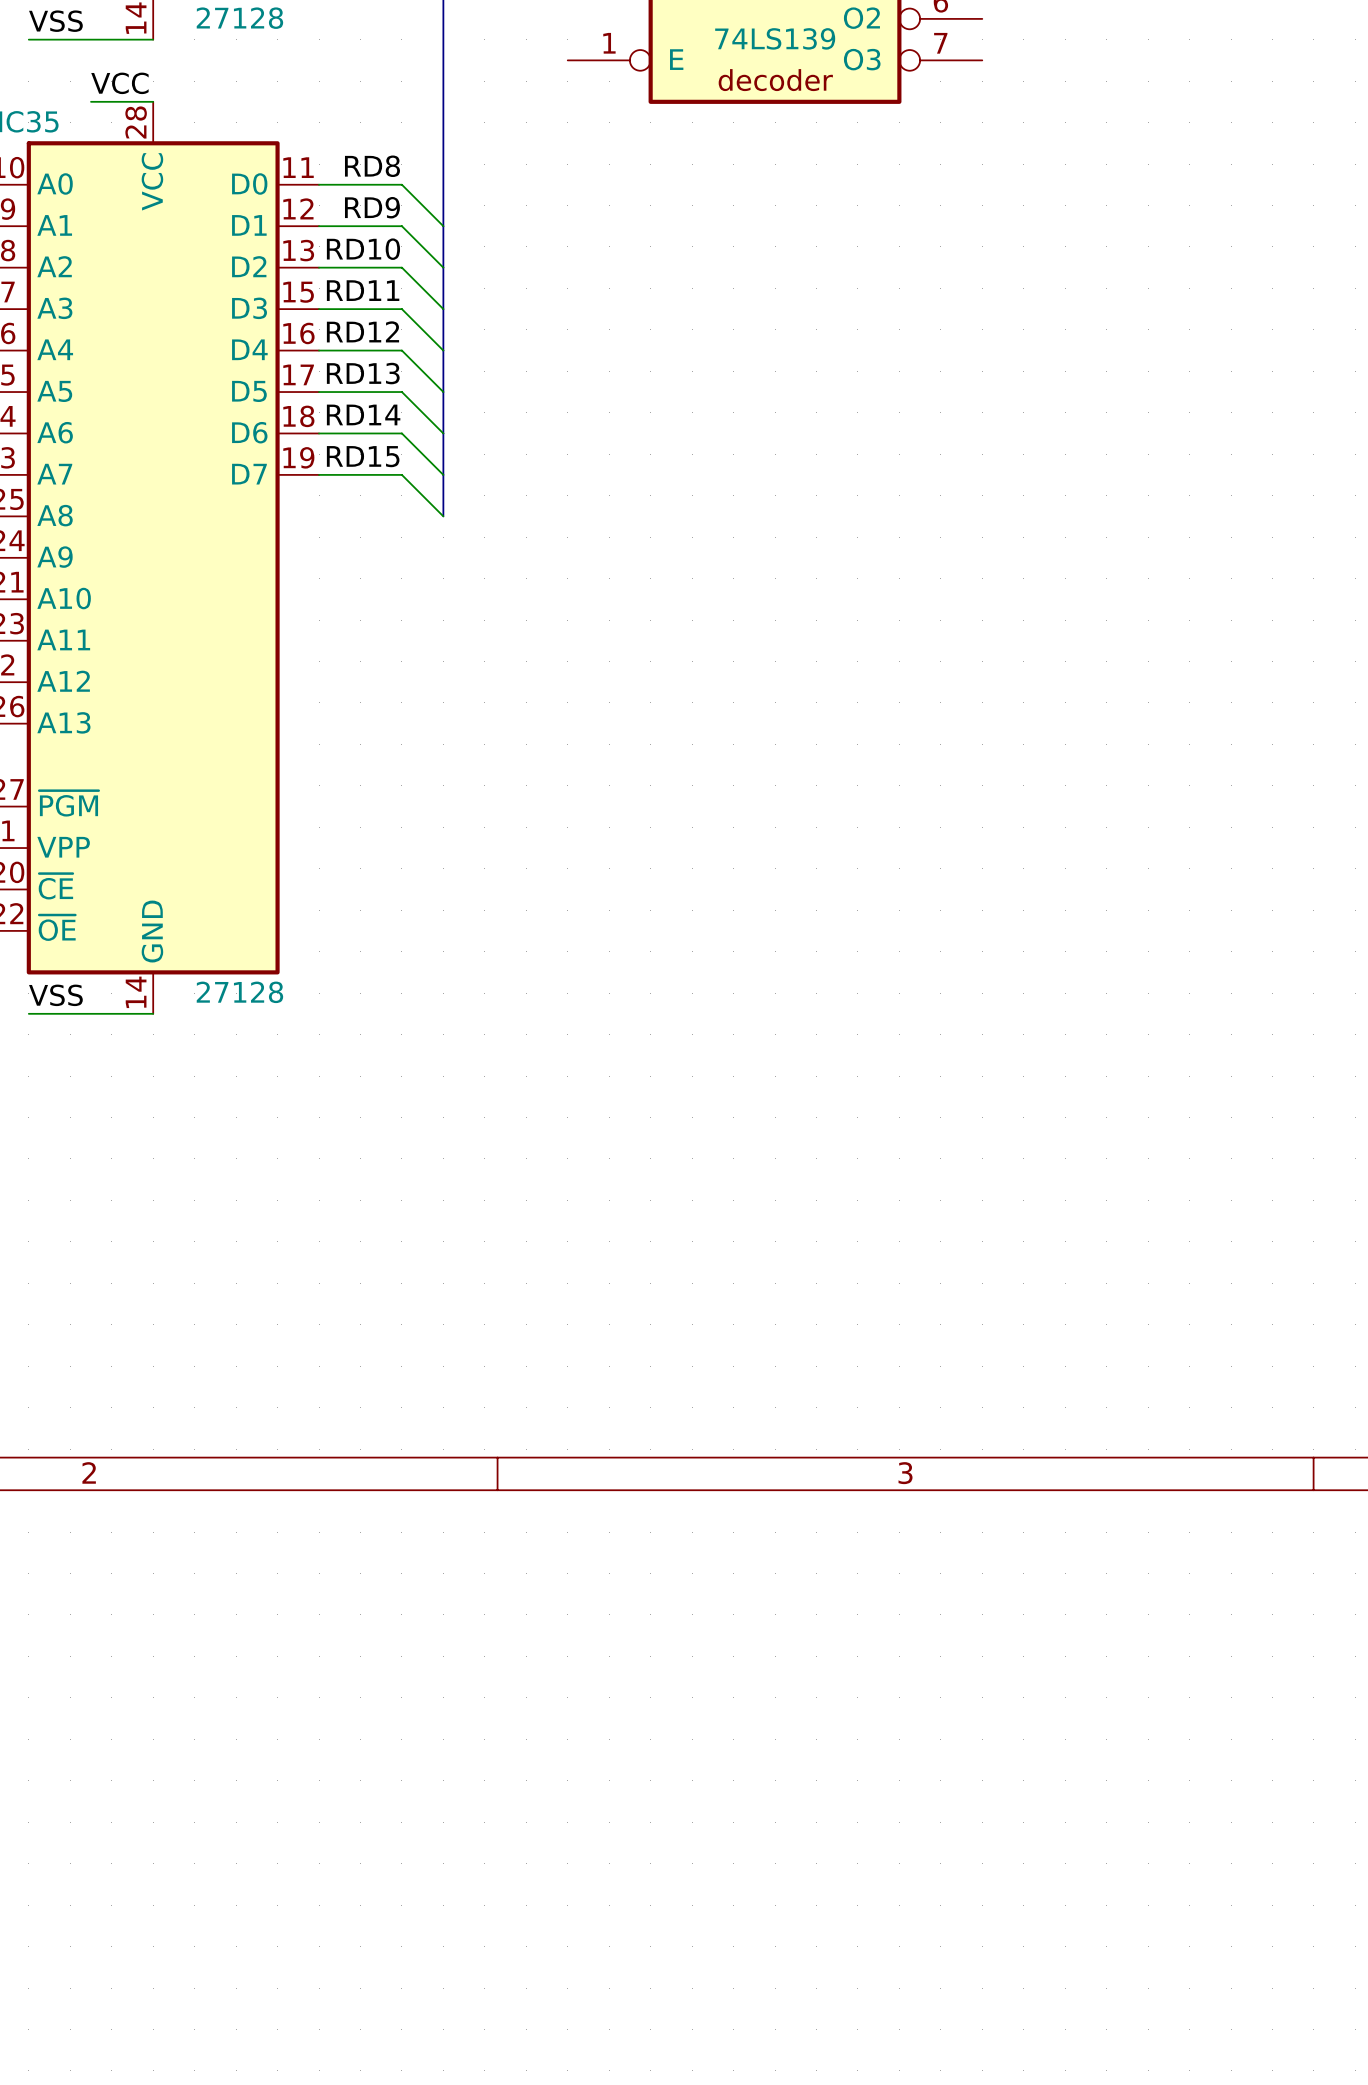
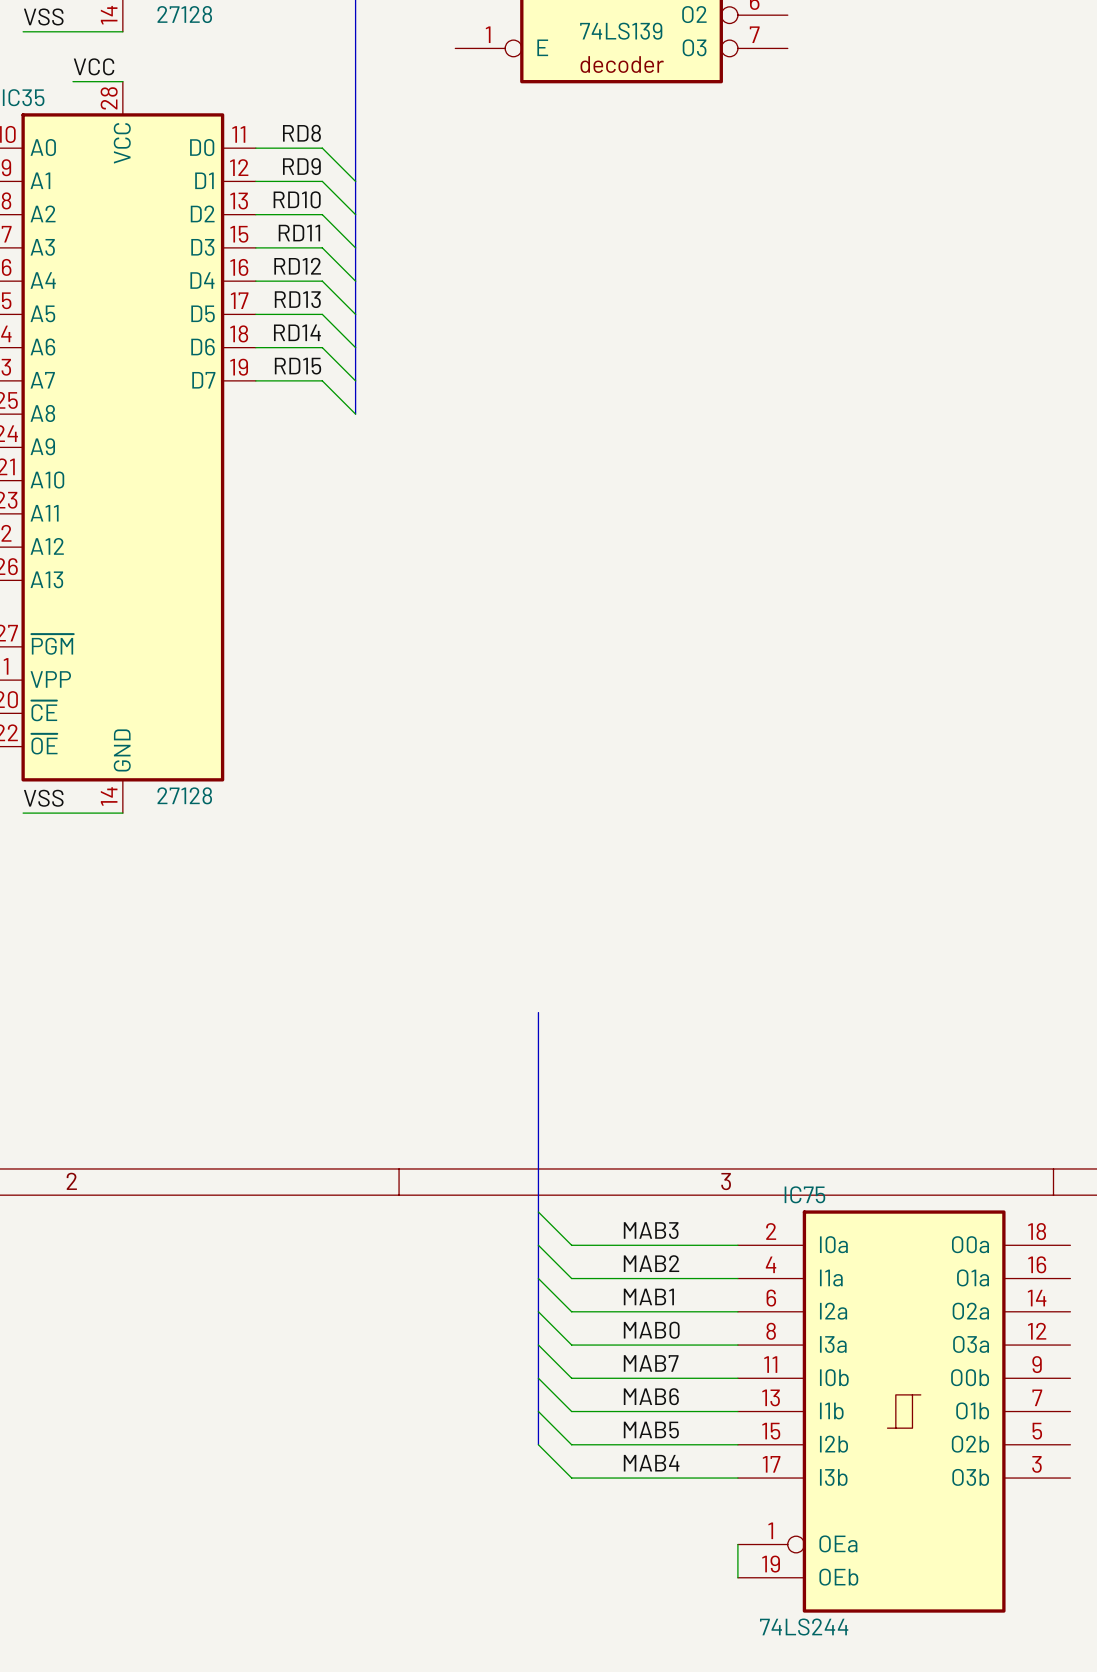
bus: none -> (538, 1012) (538, 1444)
wire: none -> (538, 1212) (571, 1245) (737, 1245)
label: none -> MAB3 (651, 1230)
wire: none -> (538, 1245) (571, 1278) (737, 1278)
label: none -> MAB2 (651, 1263)
wire: none -> (538, 1278) (571, 1311) (737, 1311)
label: none -> MAB1 (648, 1296)
wire: none -> (538, 1311) (571, 1345) (737, 1345)
label: none -> MAB0 (651, 1330)
wire: none -> (538, 1345) (571, 1378) (737, 1378)
label: none -> MAB7 (651, 1363)
wire: none -> (538, 1378) (571, 1411) (737, 1411)
label: none -> MAB6 (651, 1396)
wire: none -> (538, 1411) (571, 1444) (737, 1444)
IC75: none -> 74LS244 (904, 1411)
label: none -> MAB5 (651, 1430)
wire: none -> (538, 1444) (571, 1478) (737, 1478)
label: none -> MAB4 (651, 1463)
wire: none -> (737, 1544) (737, 1577)

